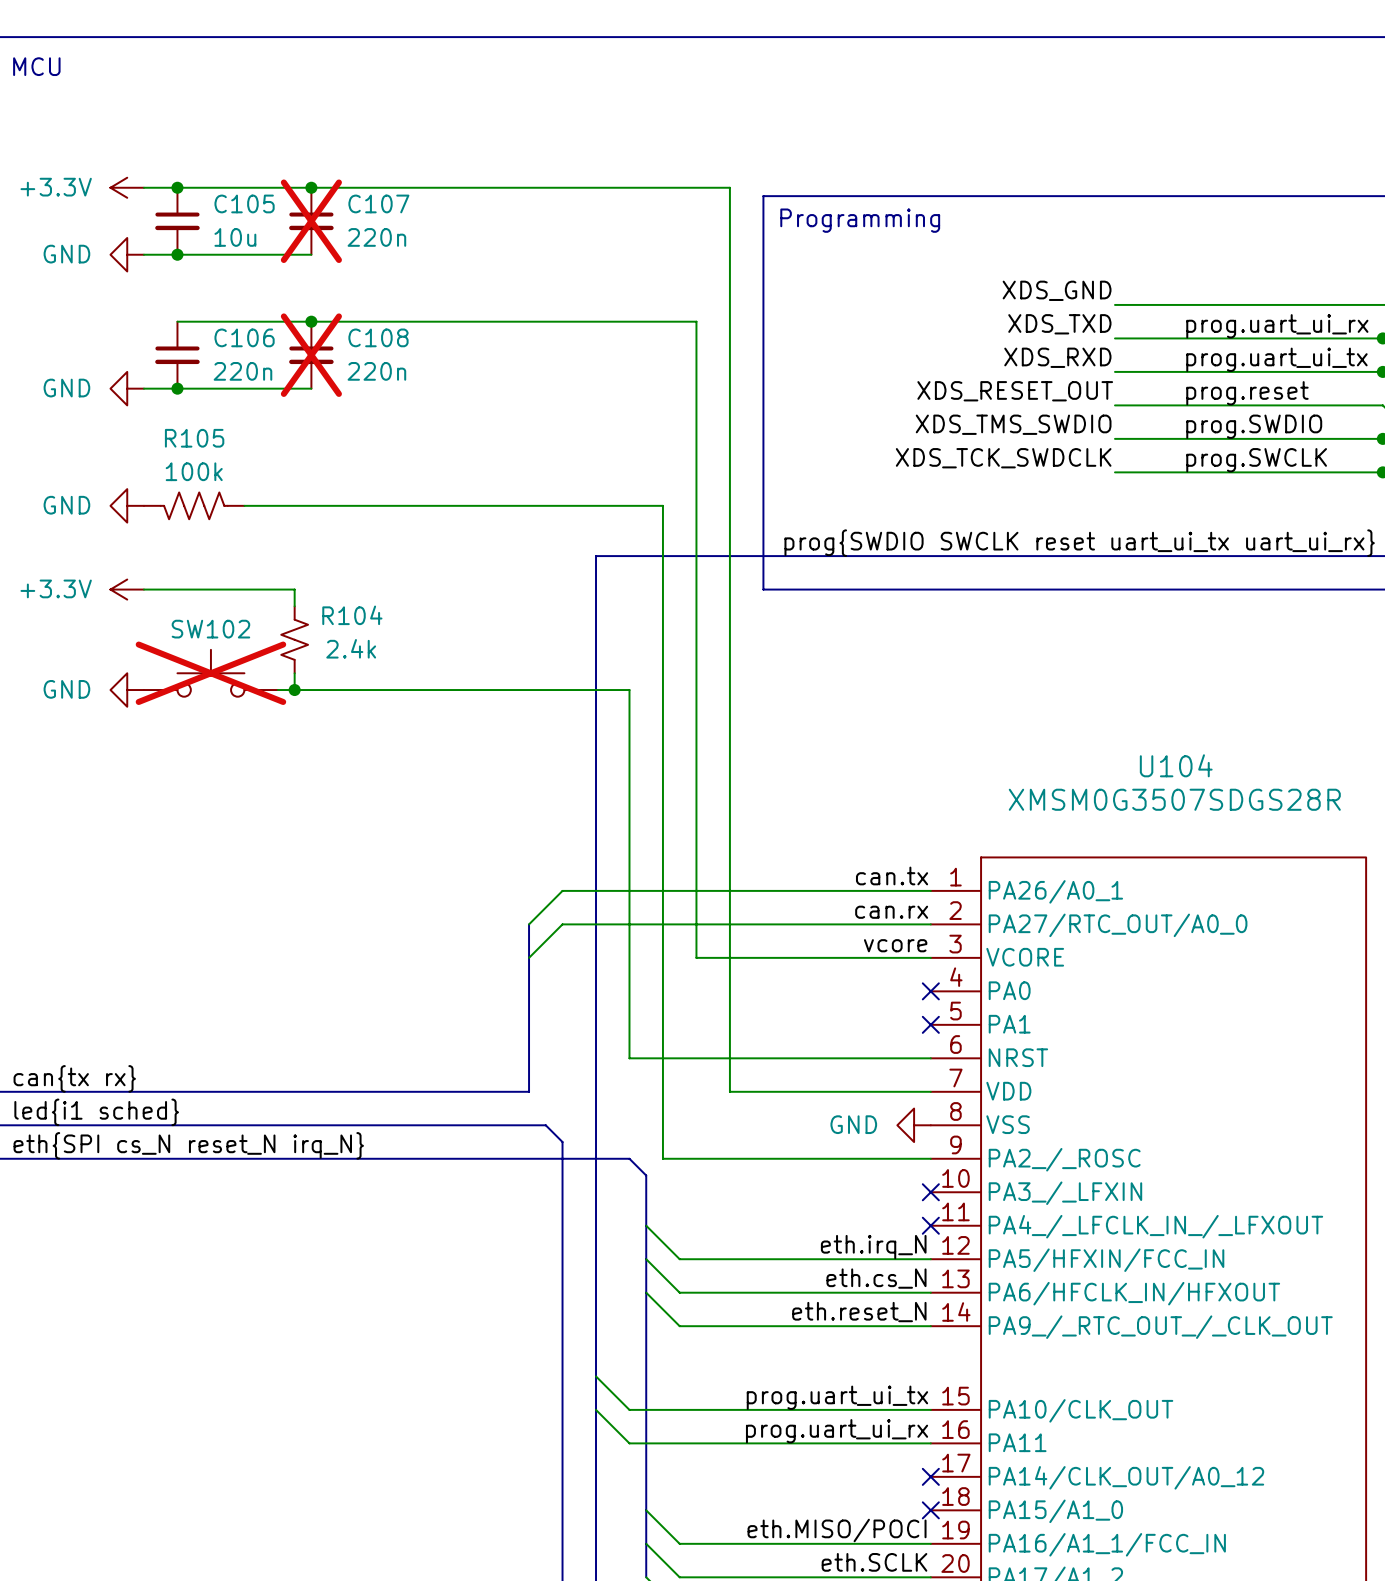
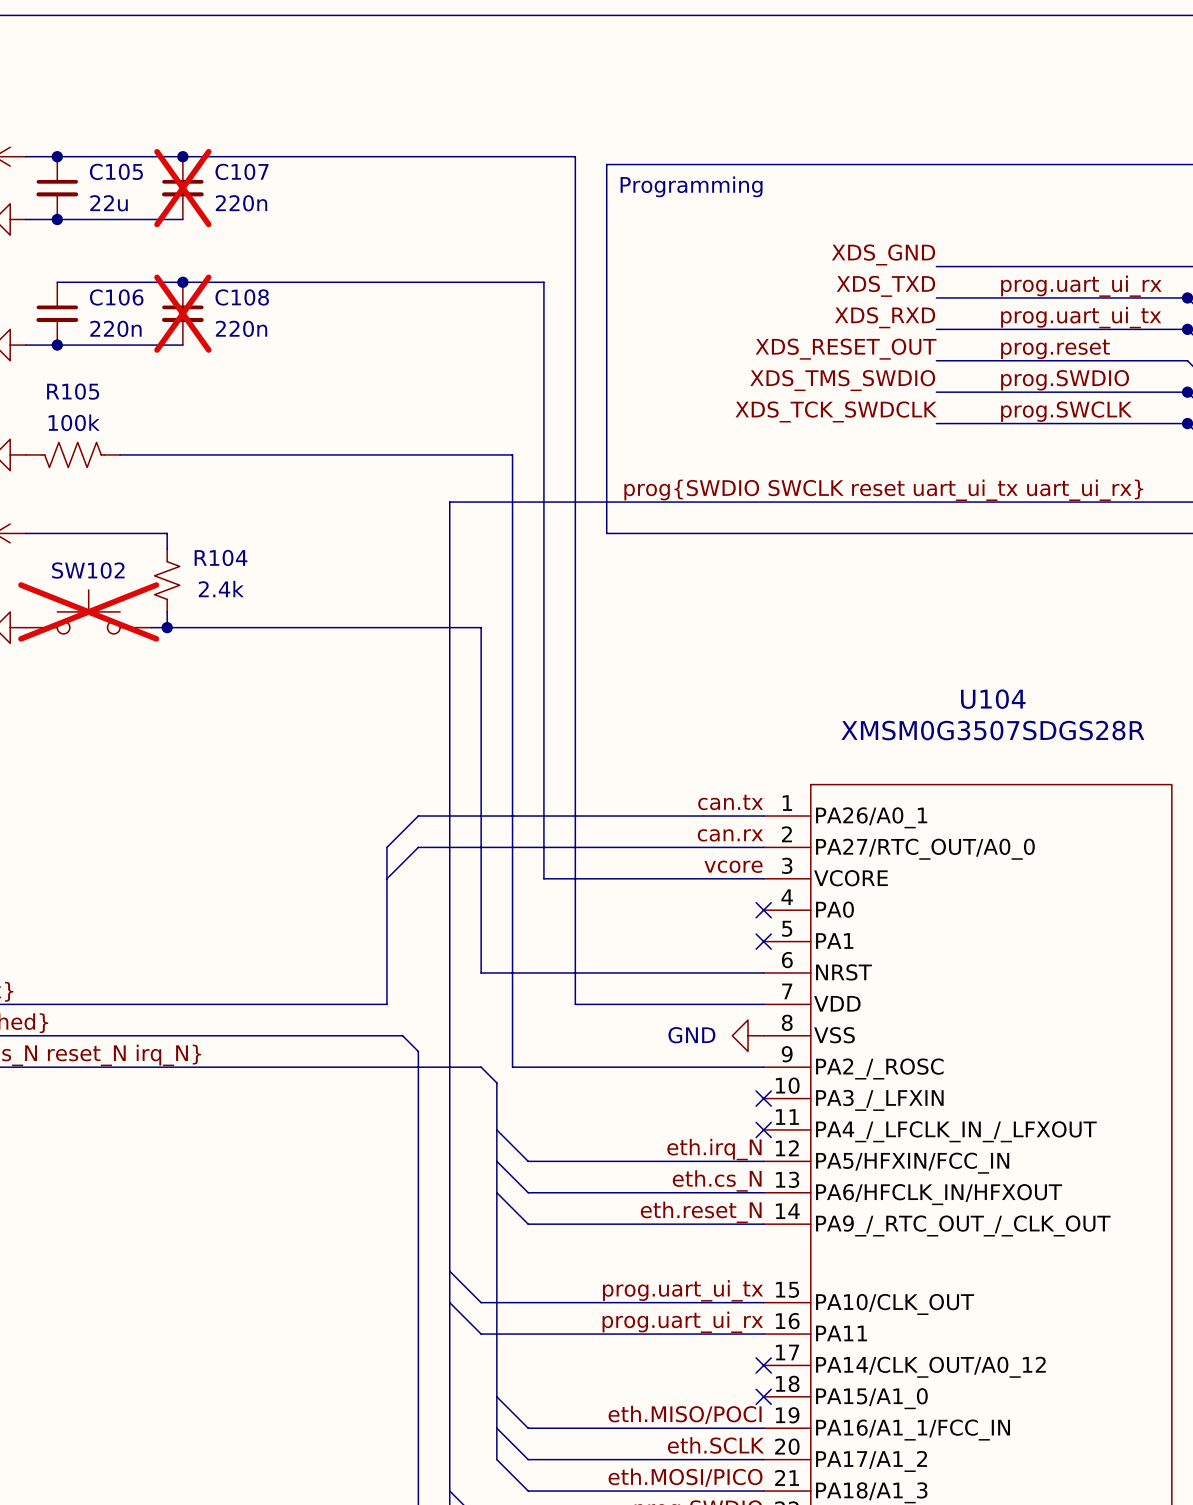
C105 value: 10u (235, 237) -> 22u (109, 203)

